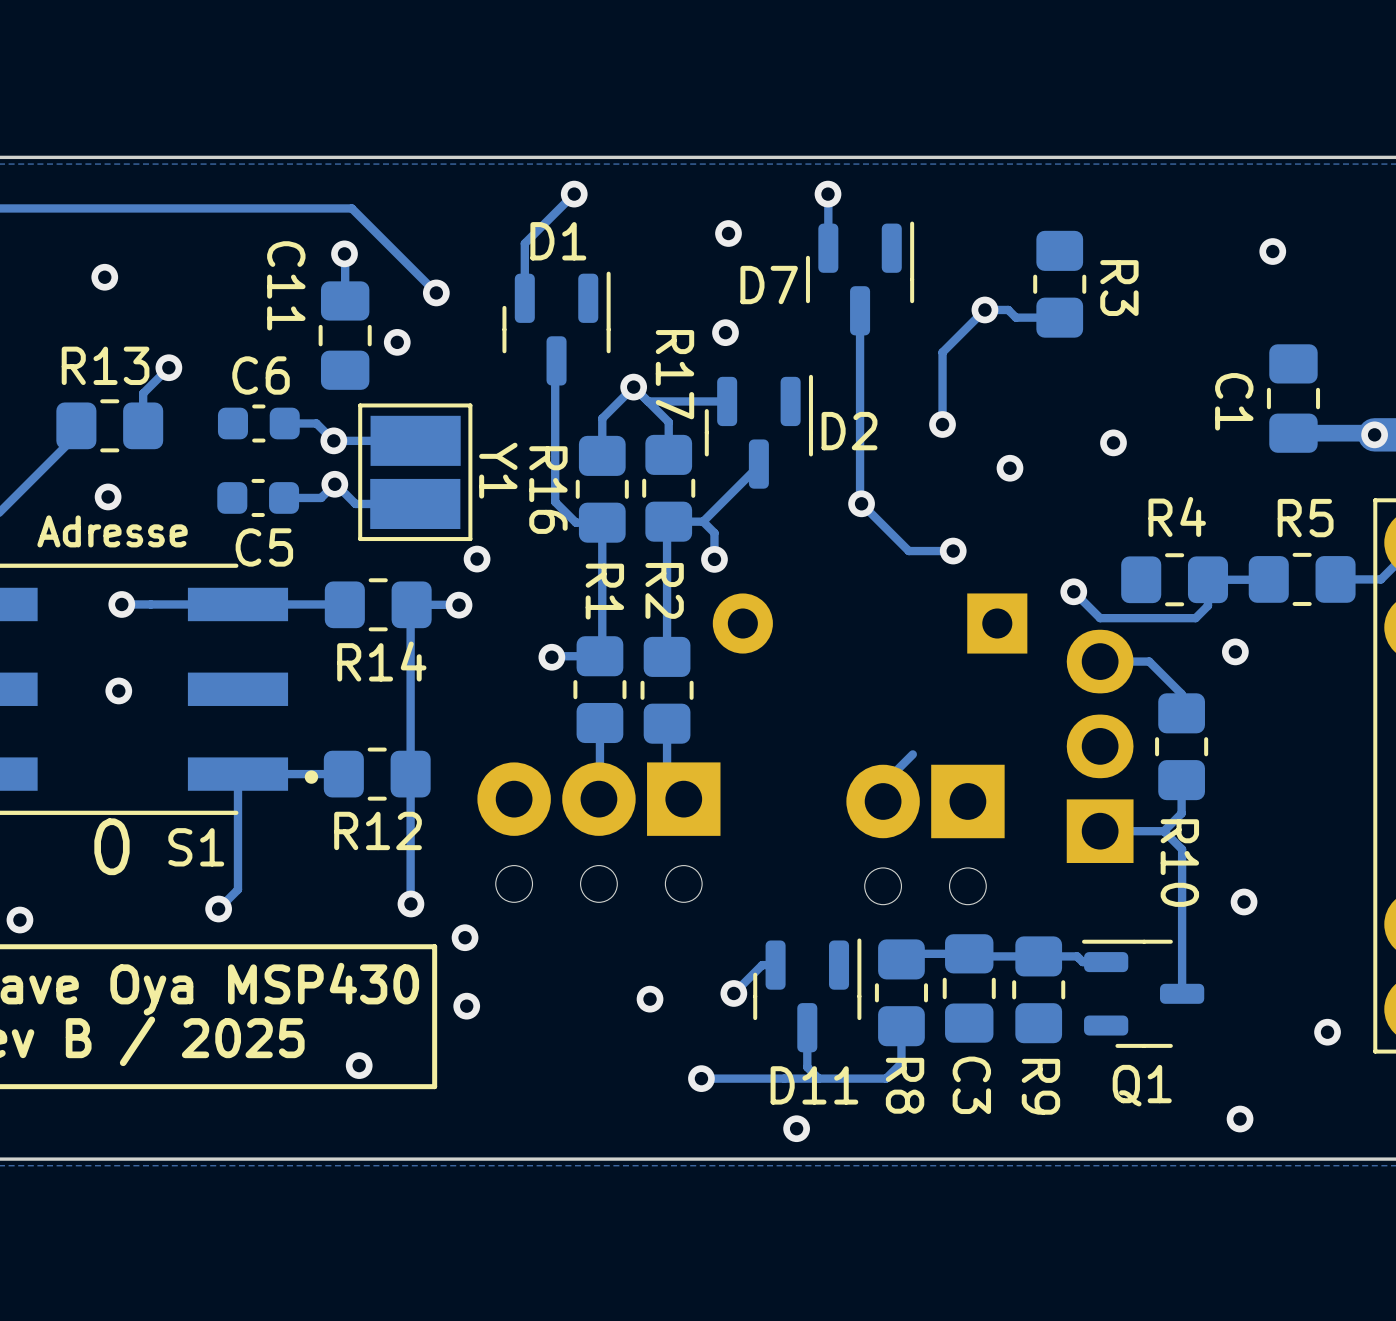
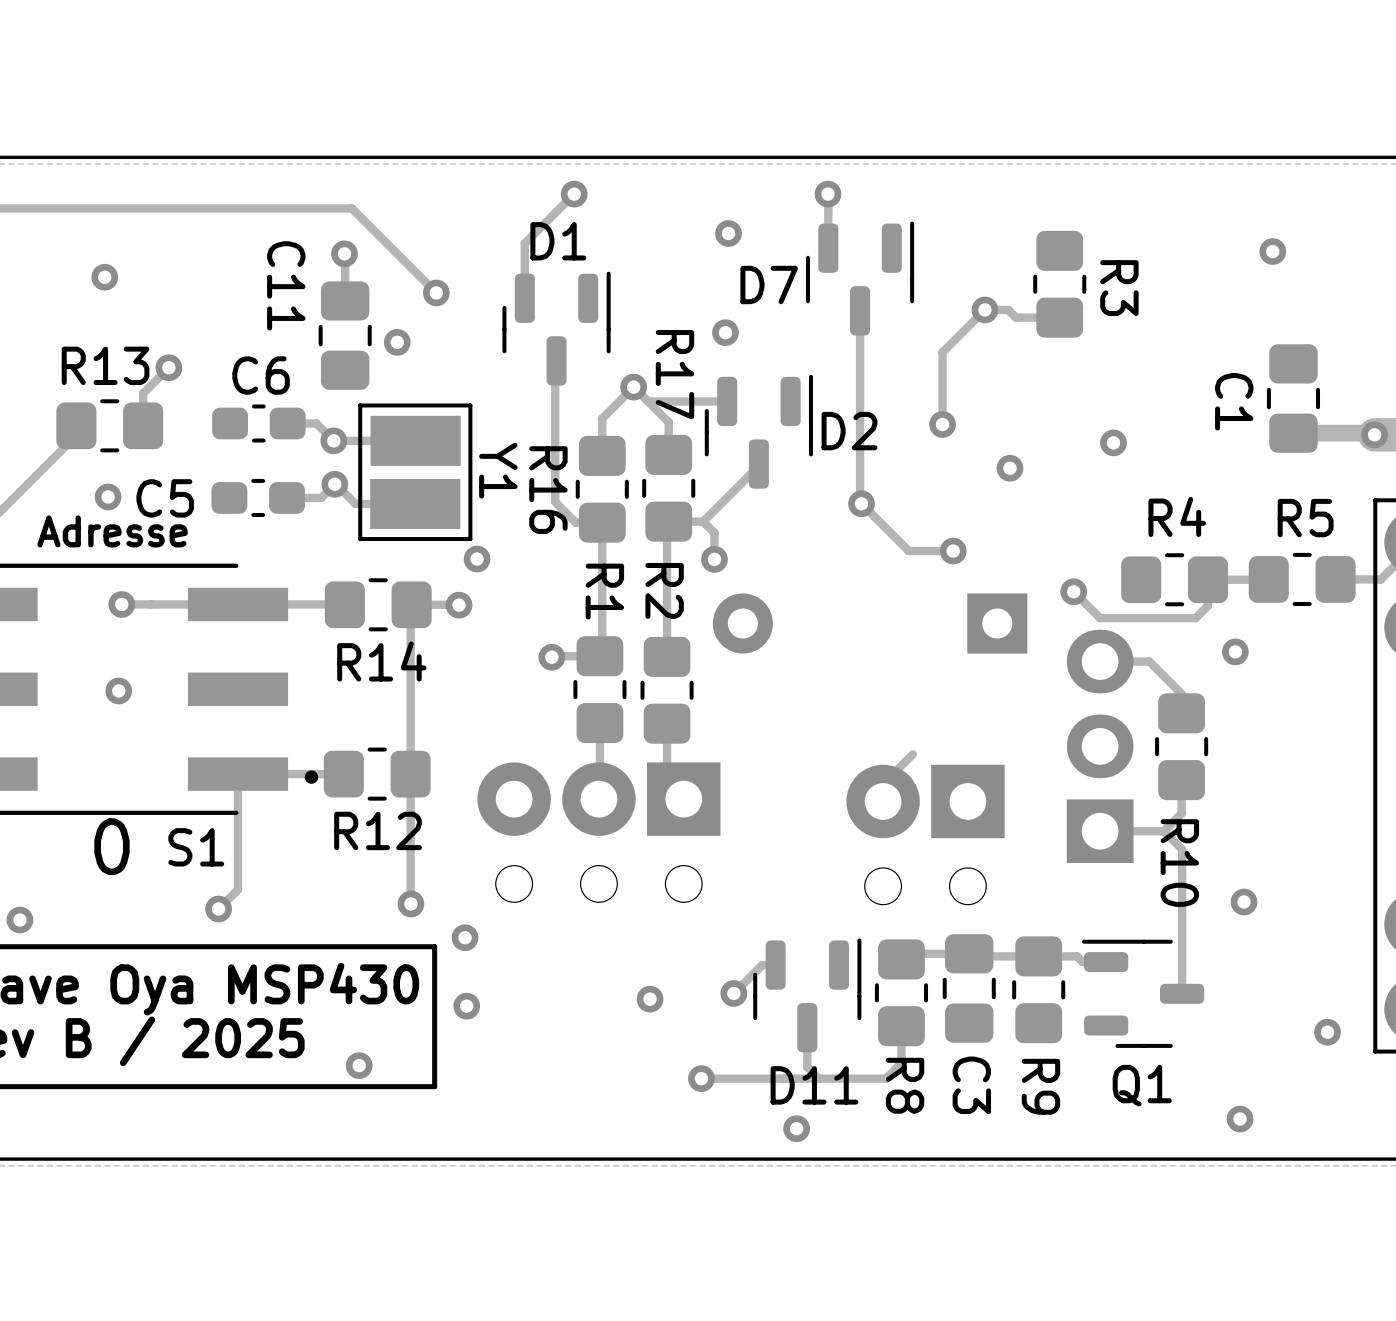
C6 footprint: [217, 404, 300, 443] -> [212, 404, 306, 443]
C5 footprint: [217, 478, 300, 517] -> [211, 478, 305, 517]
C5 name position: C5 (264, 547) -> C5 (165, 498)

